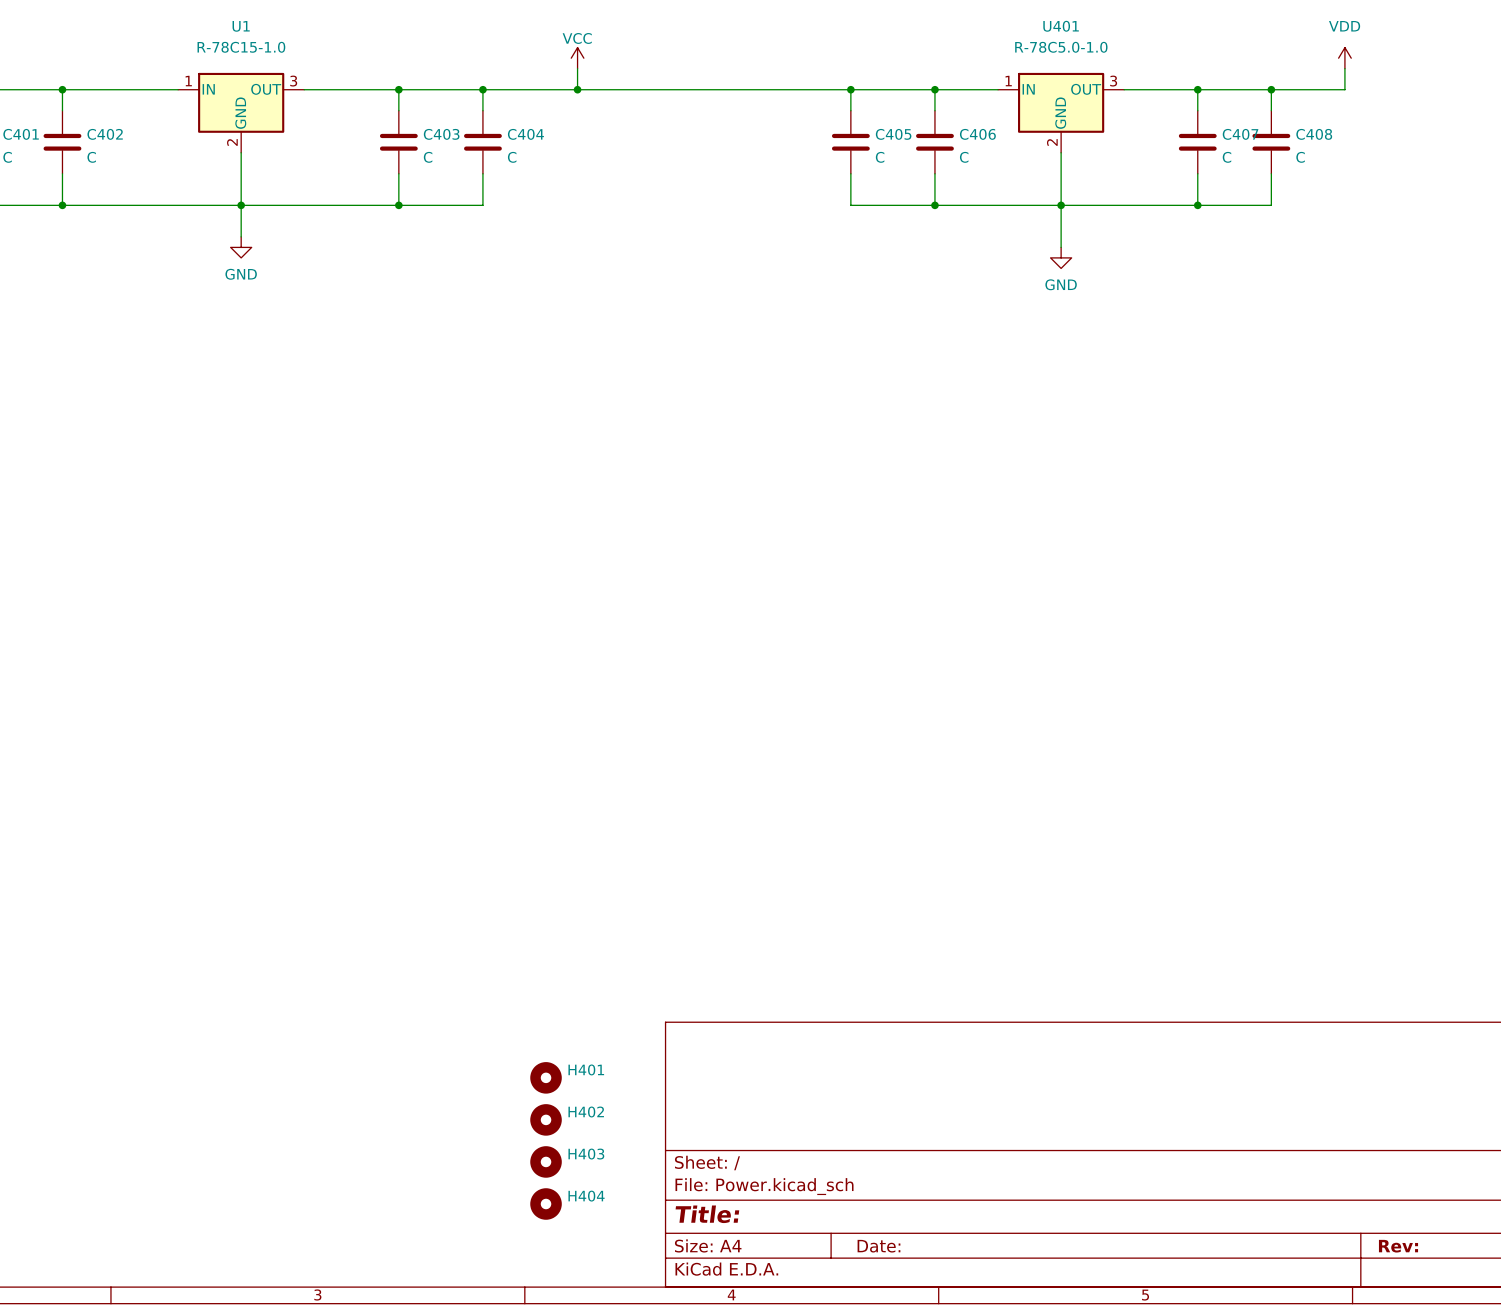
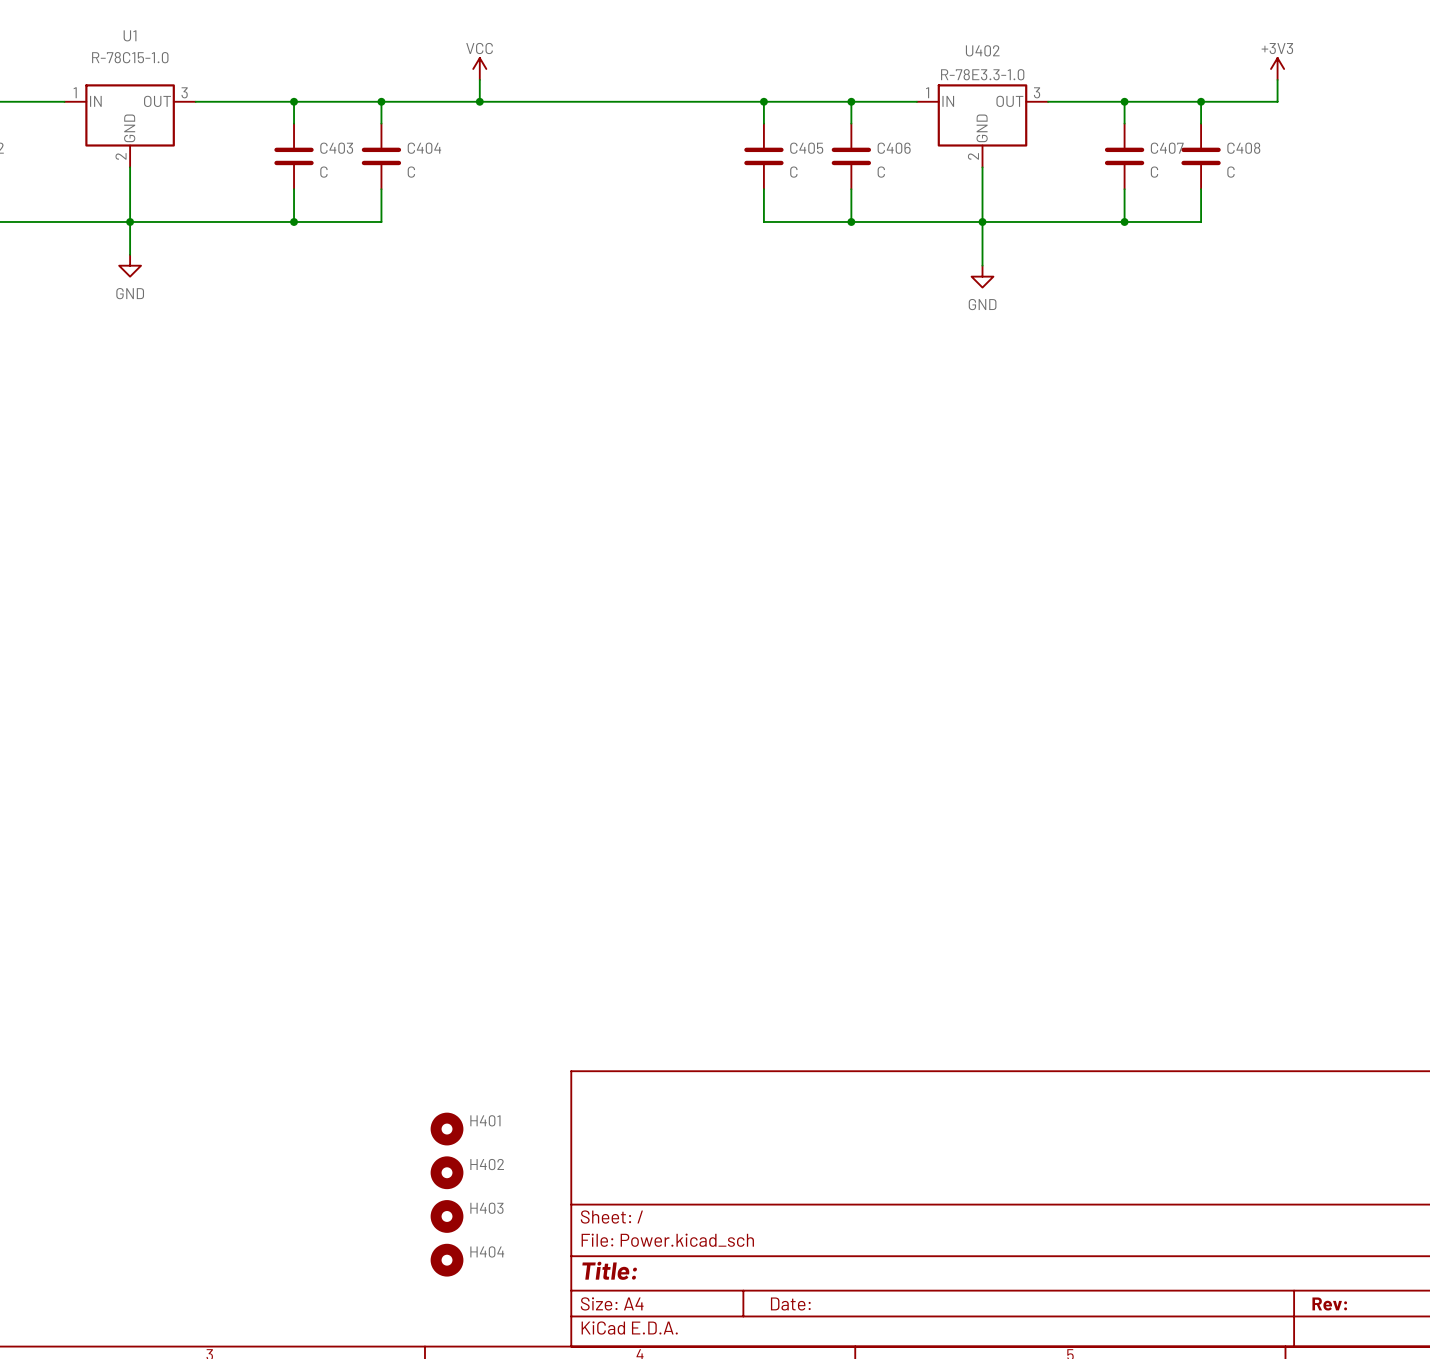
U401 name: U401 (1061, 26) -> U402 (982, 50)
U401 value: R-78C5.0-1.0 (1061, 47) -> R-78E3.3-1.0 (982, 74)
power symbol: VDD (1344, 58) -> +3V3 (1277, 68)

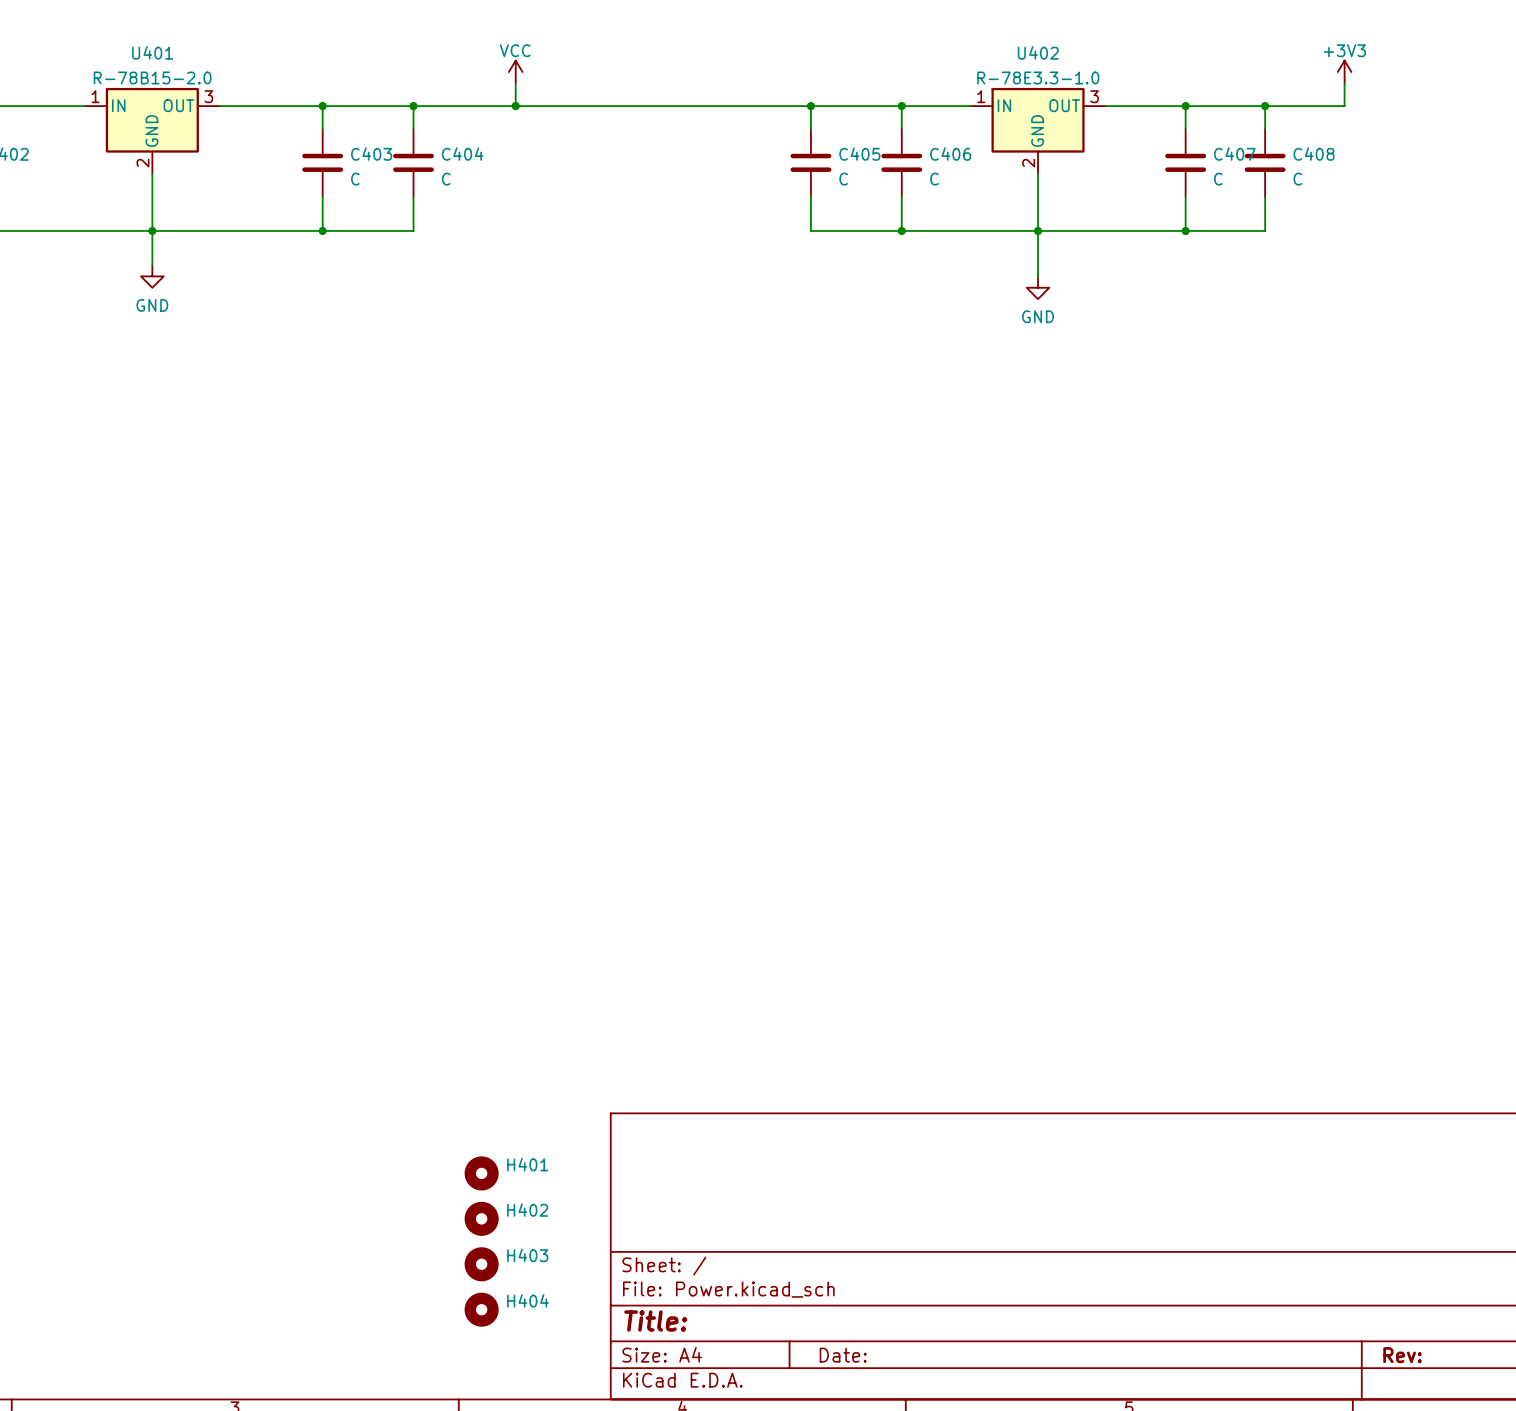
U1 name: U1 (130, 35) -> U401 (152, 52)
U1 value: R-78C15-1.0 (130, 57) -> R-78B15-2.0 (152, 77)

